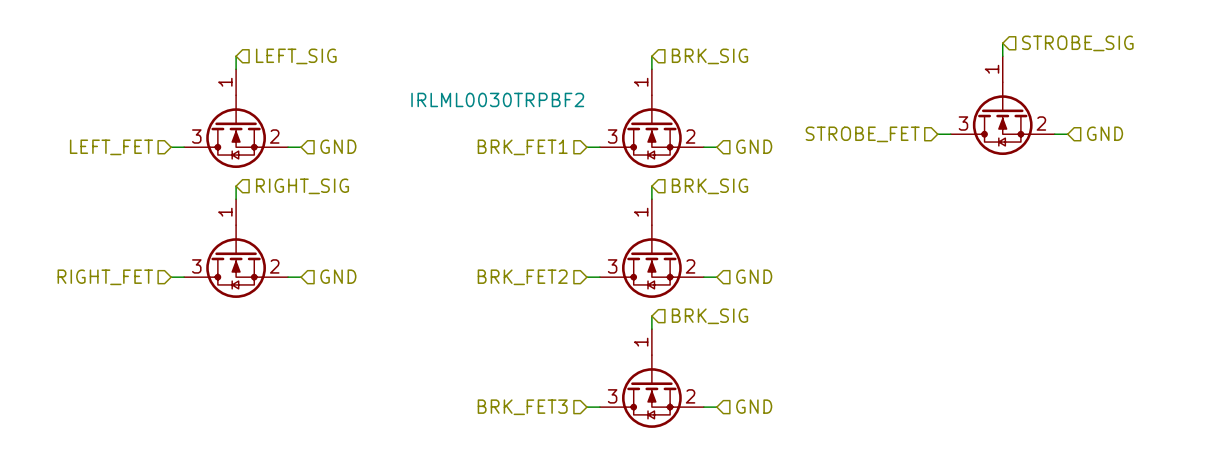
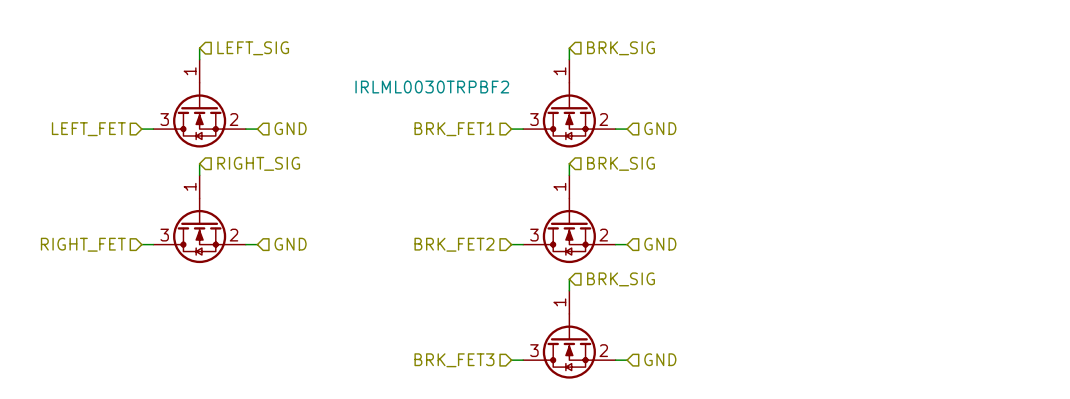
wire: (1002, 43) (1002, 56) -> none
hierarchical label: STROBE_SIG (1077, 43) -> none
part: (1002, 105) -> none
hierarchical label: GND (1105, 133) -> none
hierarchical label: STROBE_FET (862, 134) -> none
wire: (937, 134) (950, 134) -> none
wire: (1054, 134) (1067, 134) -> none

